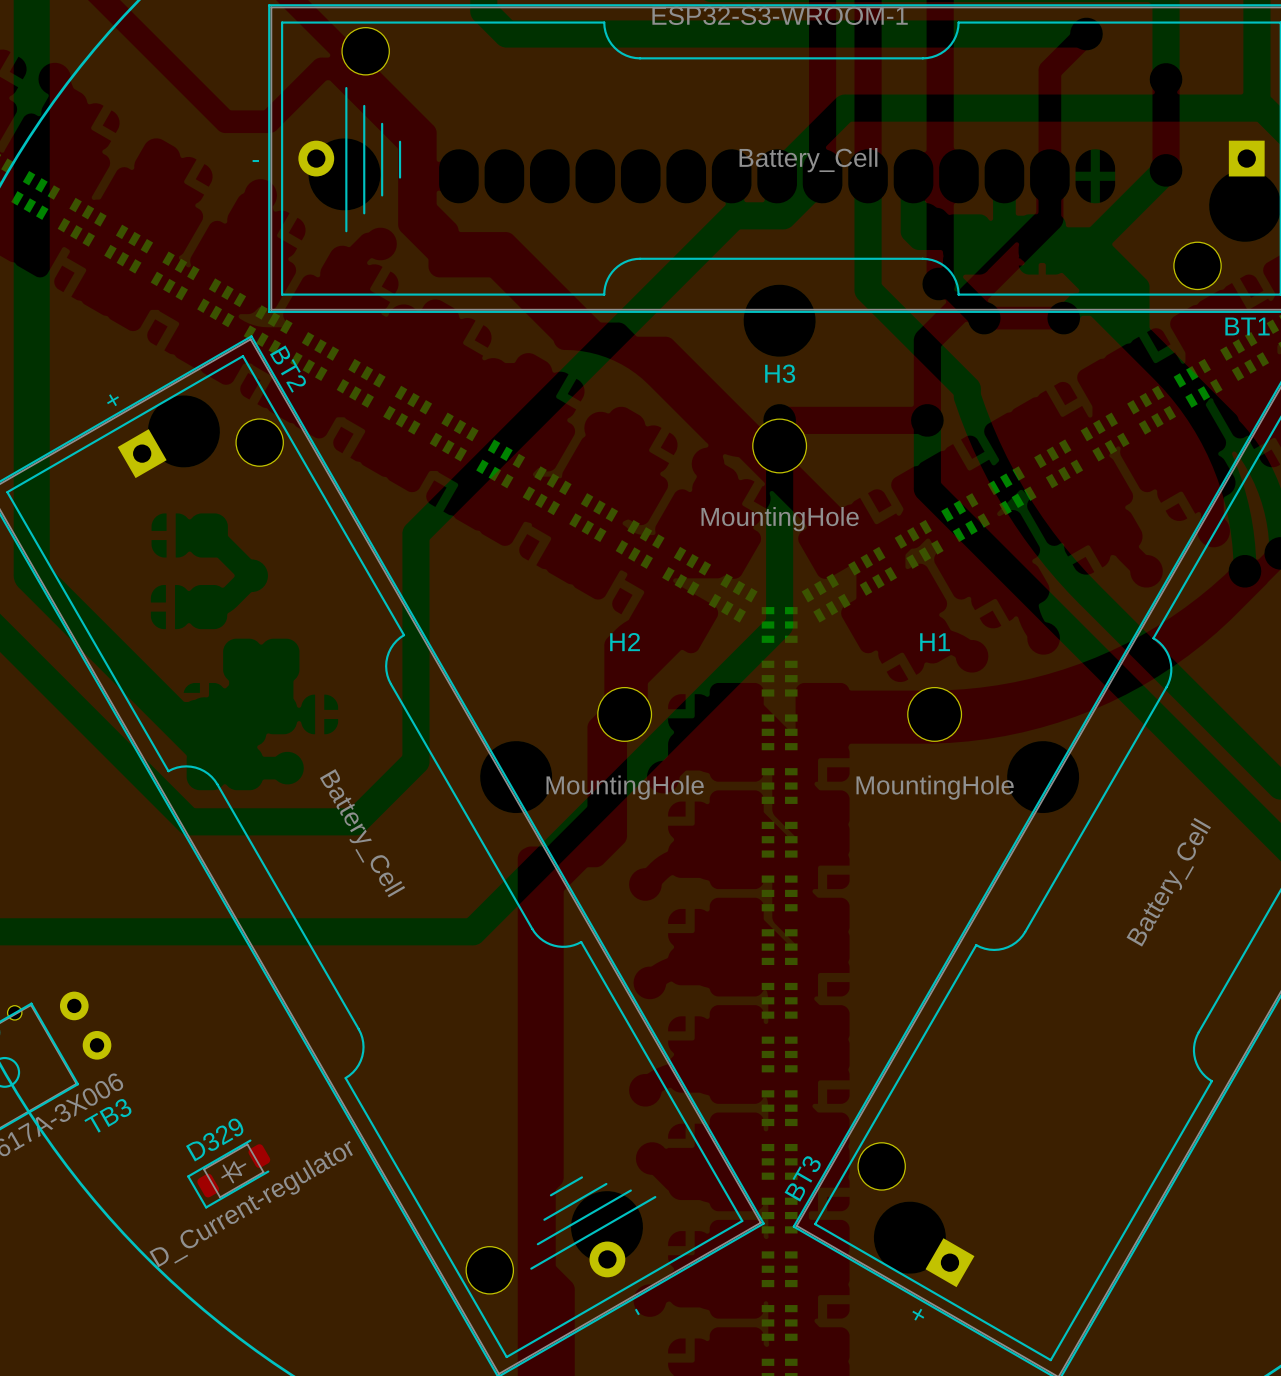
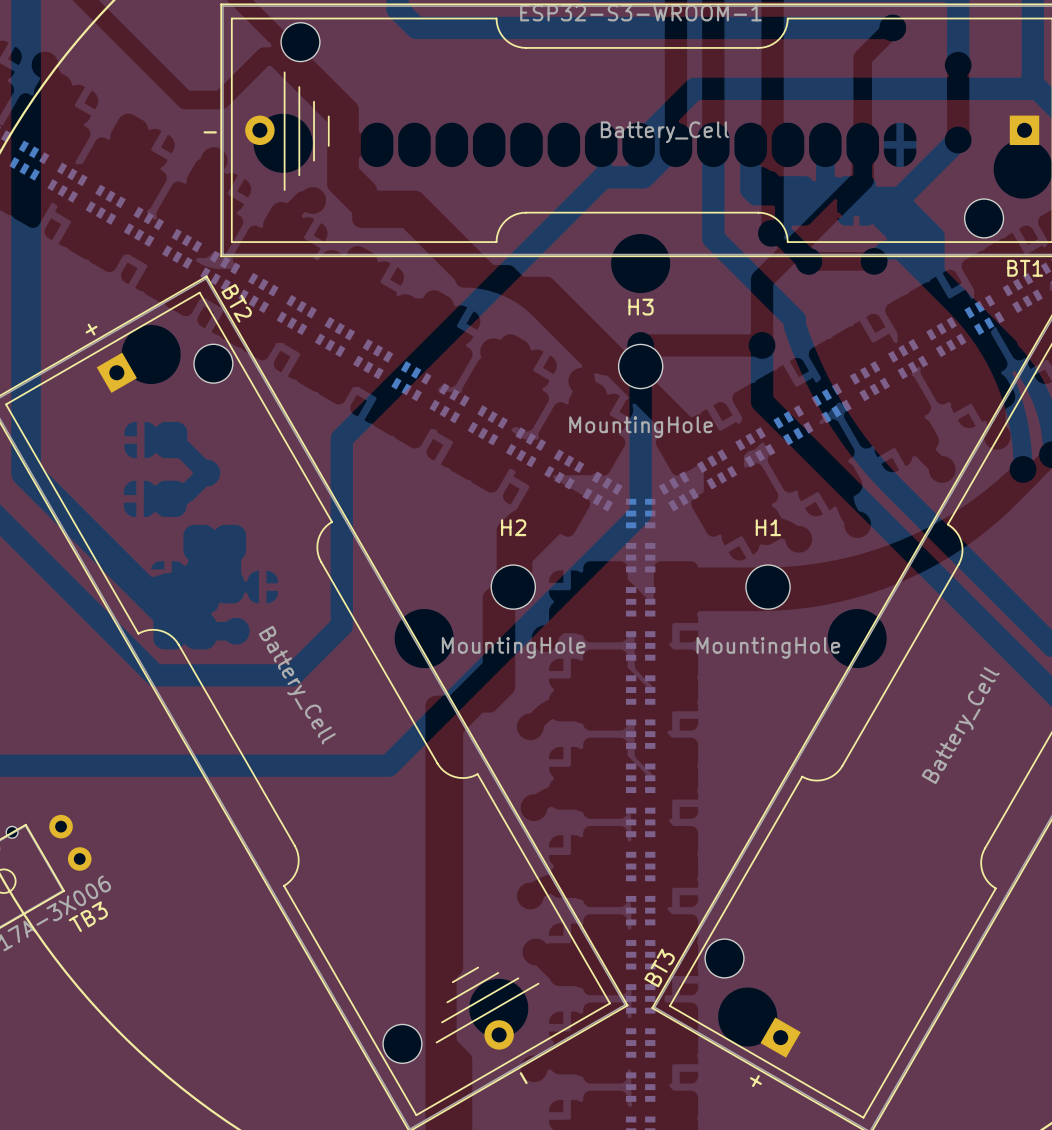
D329: D_Current-regulator (228, 1173) -> none

